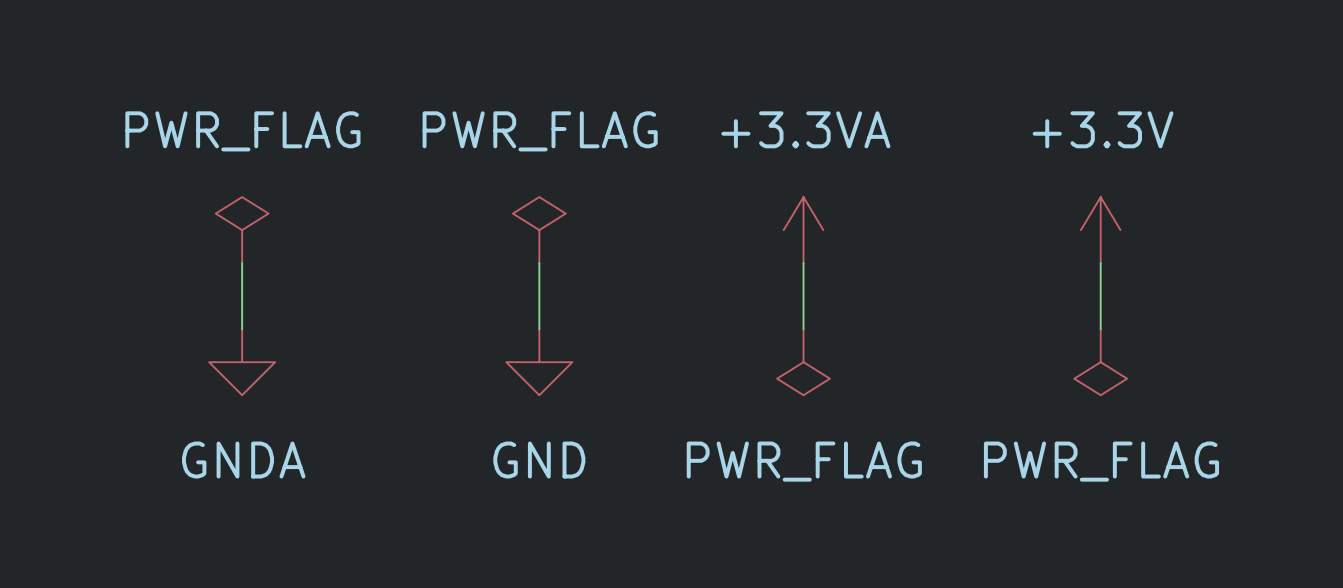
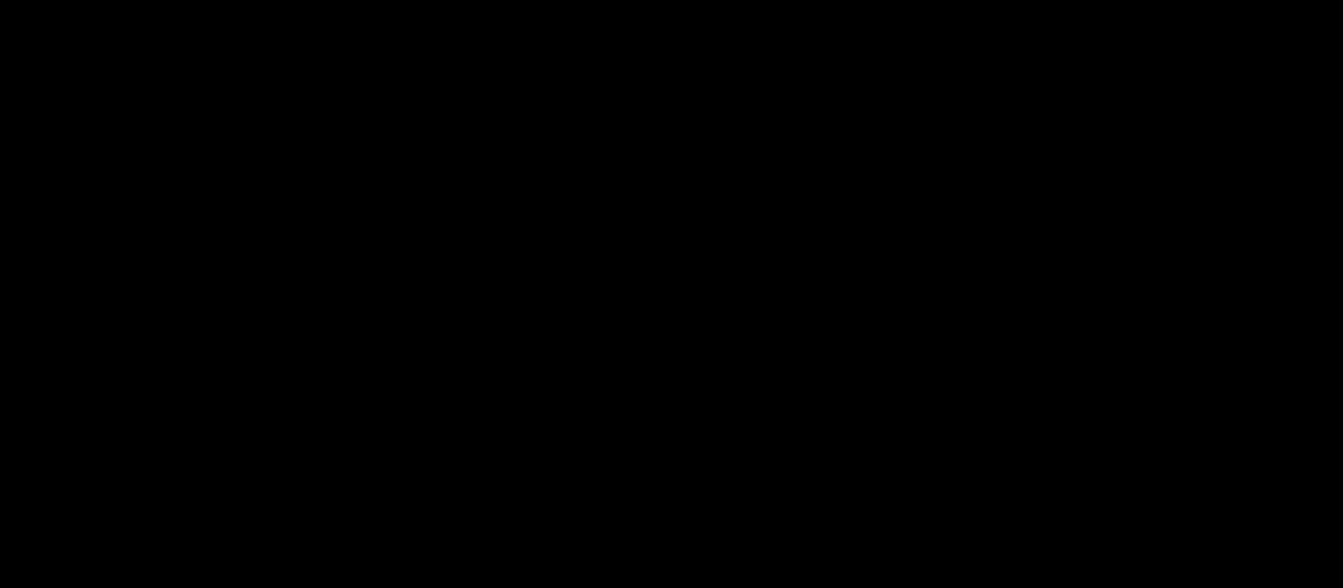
power symbol: PWR_FLAG (242, 230) -> none
power symbol: PWR_FLAG (539, 230) -> none
power symbol: +3.3VA (803, 230) -> none
power symbol: +3.3V (1100, 230) -> none
wire: (242, 263) (242, 329) -> none
wire: (539, 263) (539, 329) -> none
wire: (803, 263) (803, 329) -> none
wire: (1100, 263) (1100, 329) -> none
power symbol: GNDA (242, 362) -> none
power symbol: GND (539, 362) -> none
power symbol: PWR_FLAG (803, 362) -> none
power symbol: PWR_FLAG (1100, 362) -> none

